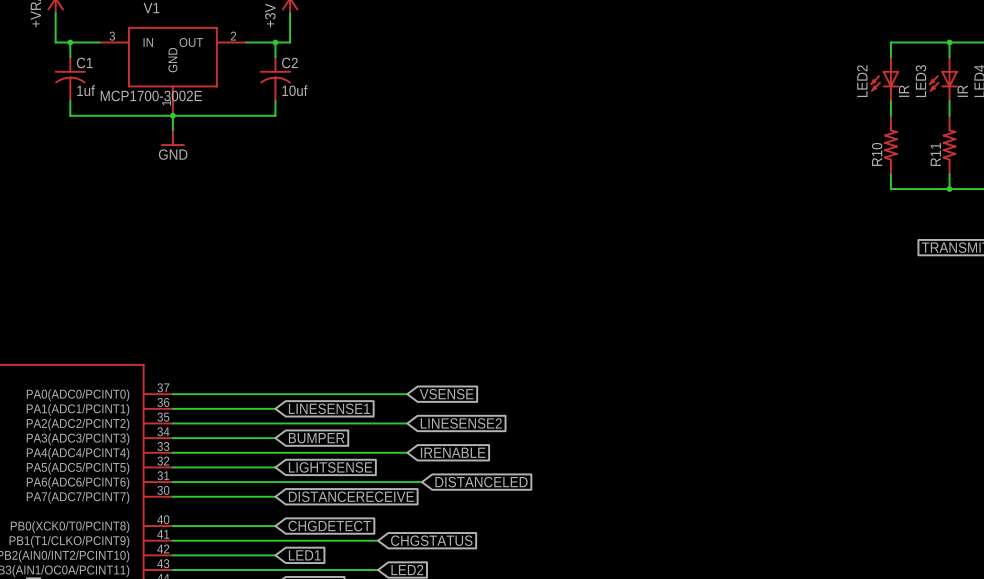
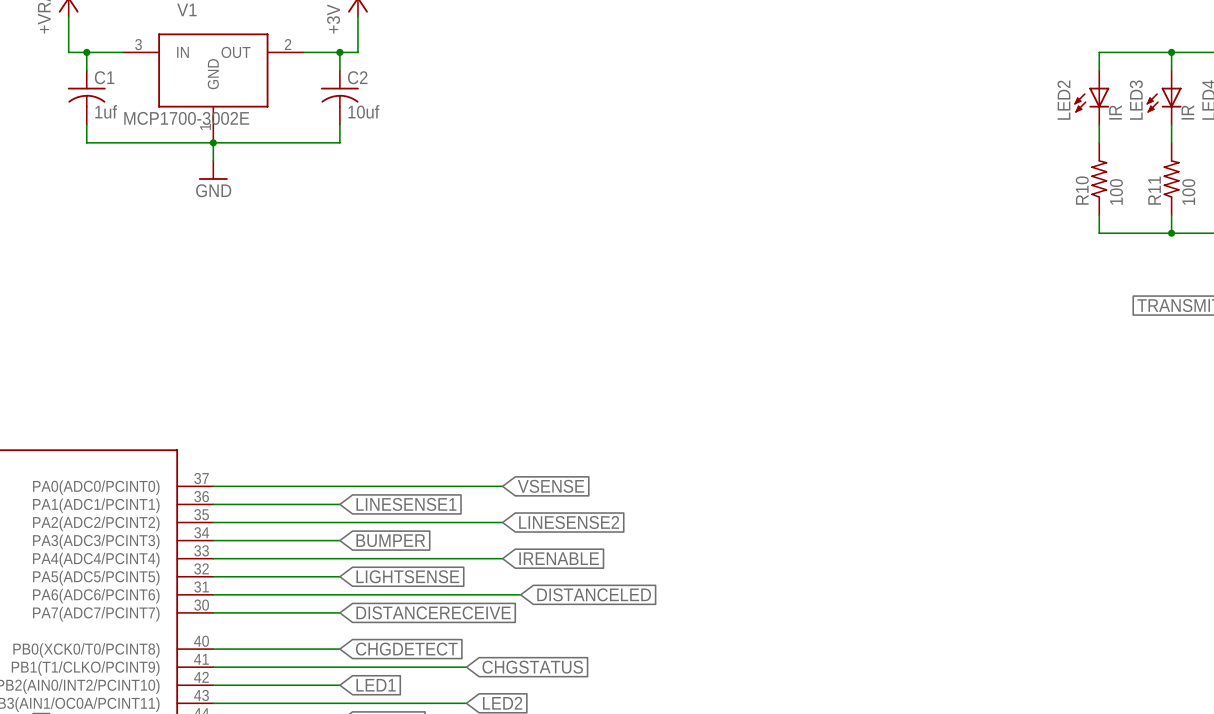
R10 value: none -> 100 (1116, 191)
R11 value: none -> 100 (1188, 191)

